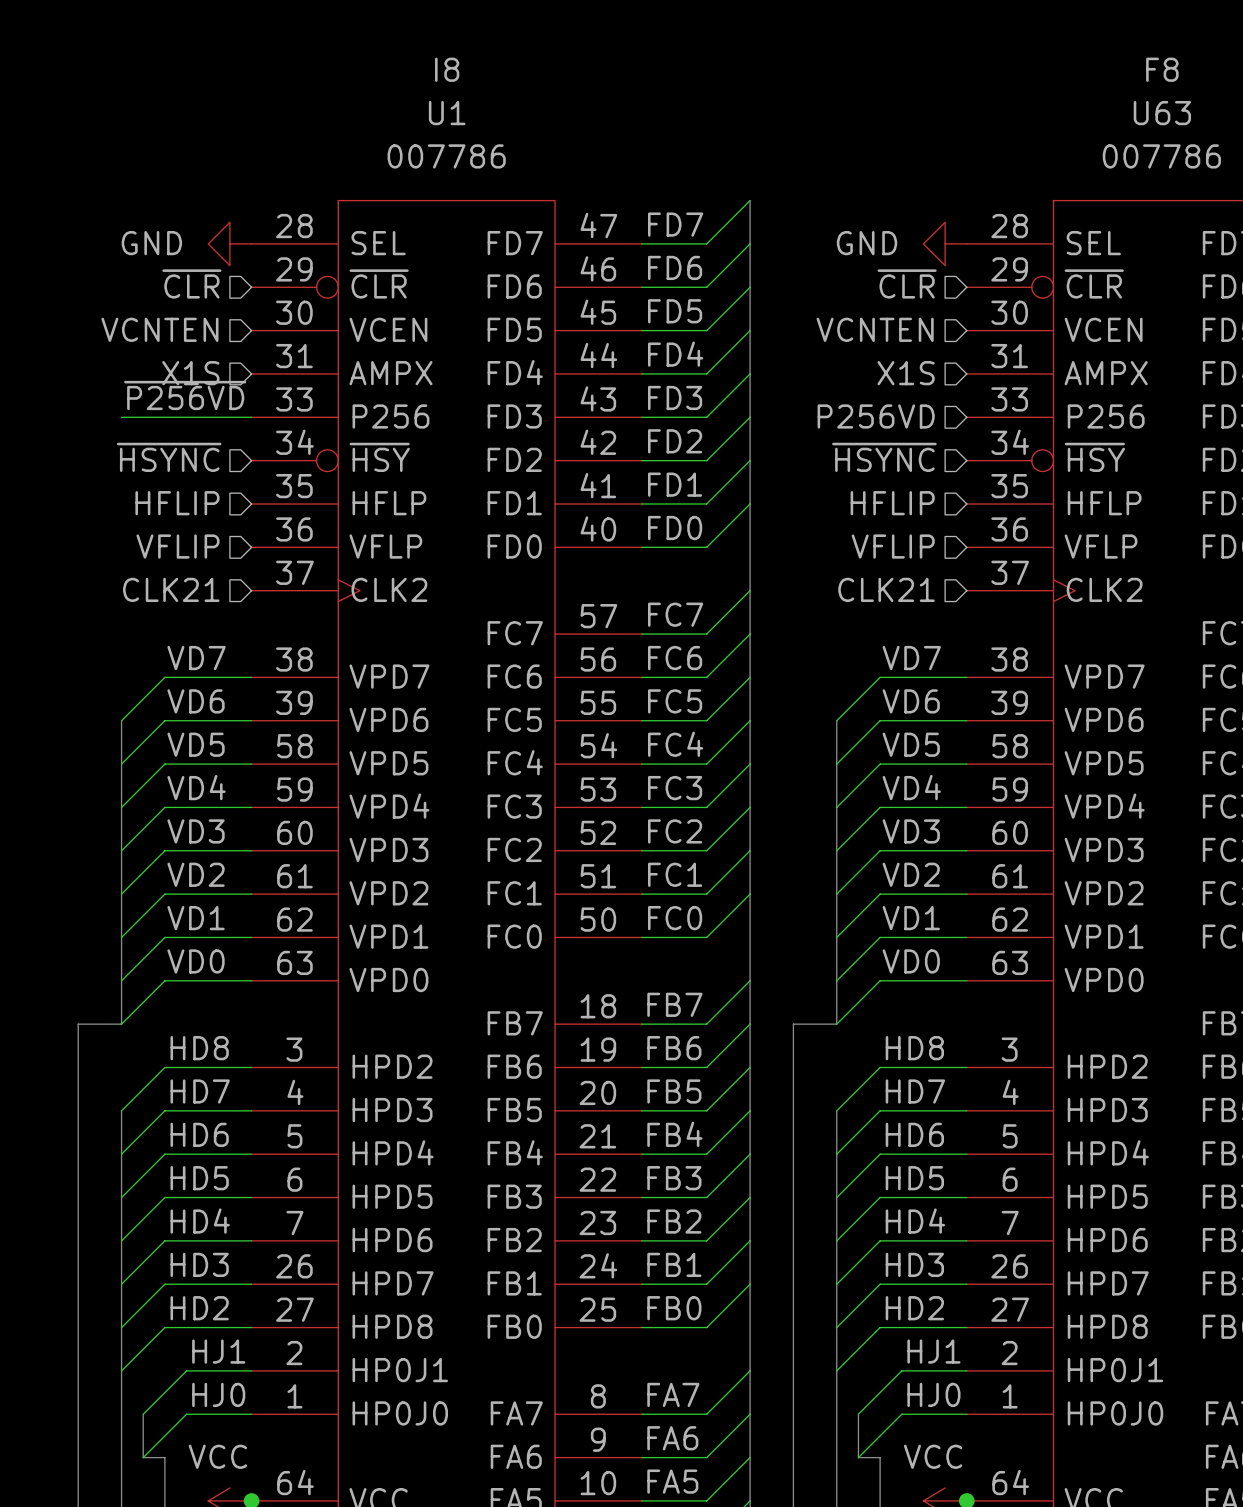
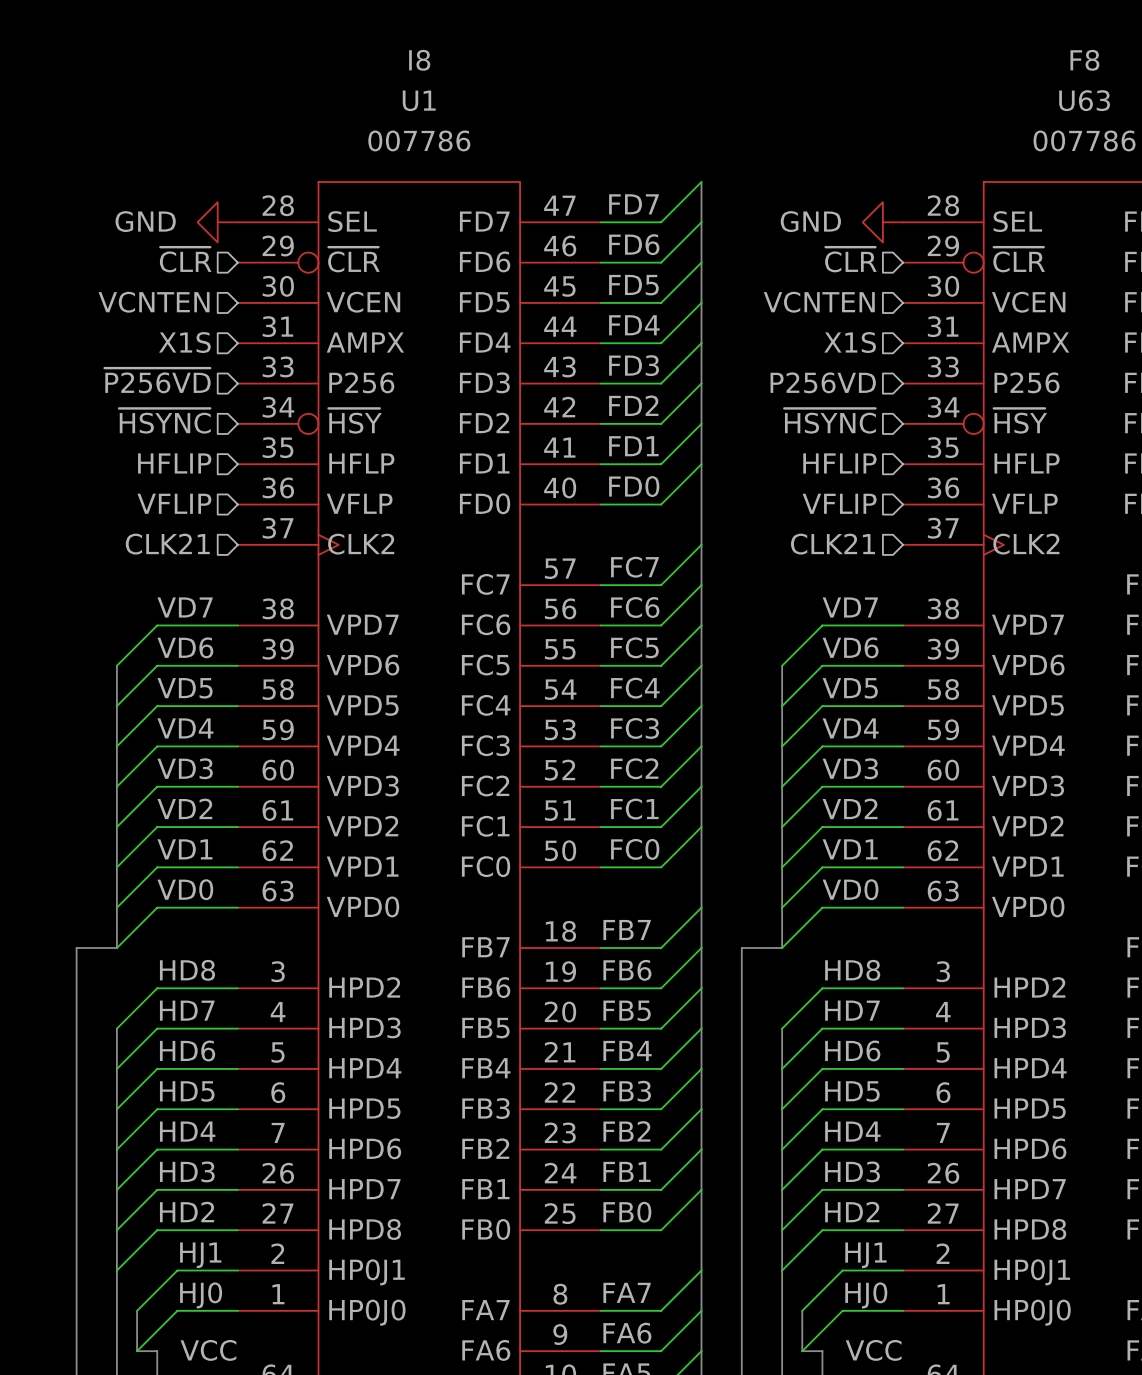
label: ~{P256VD} (185, 395) -> none
hierarchical label: none -> ~{P256VD} (157, 380)
wire: (121, 417) (251, 417) -> none

